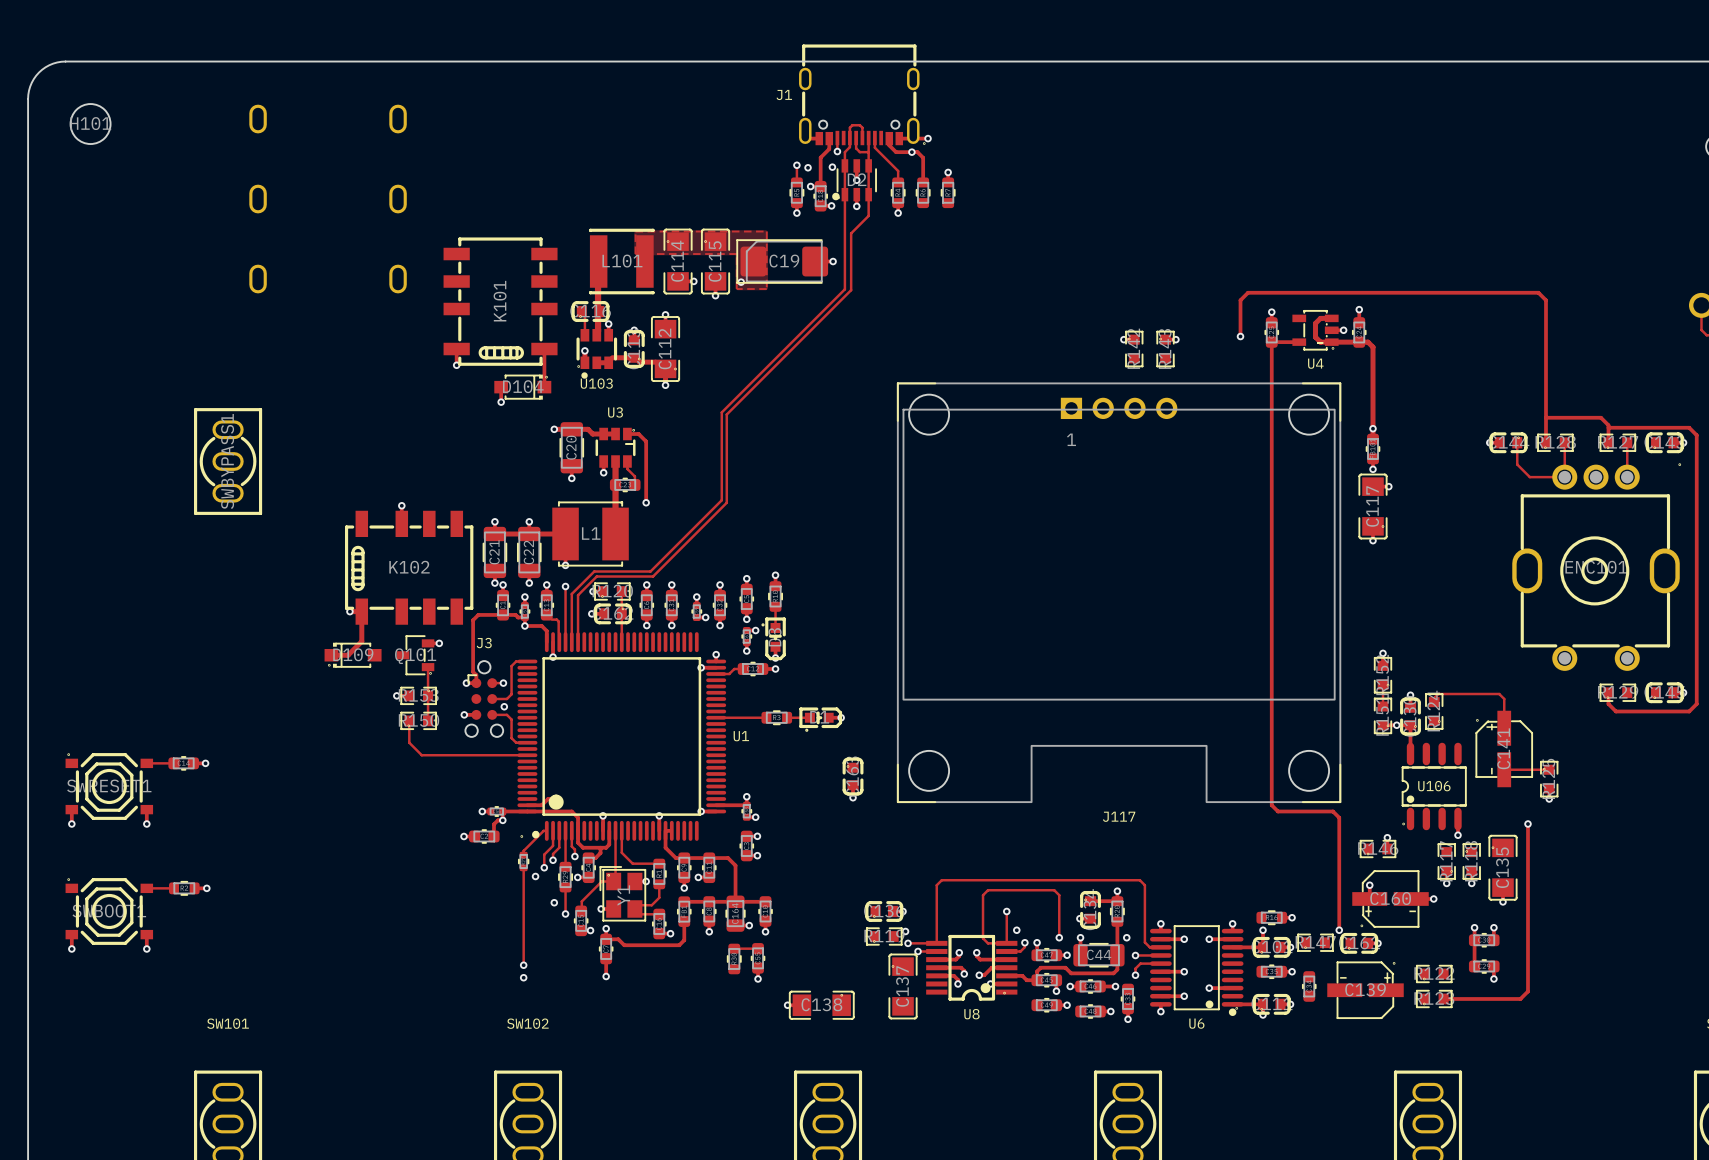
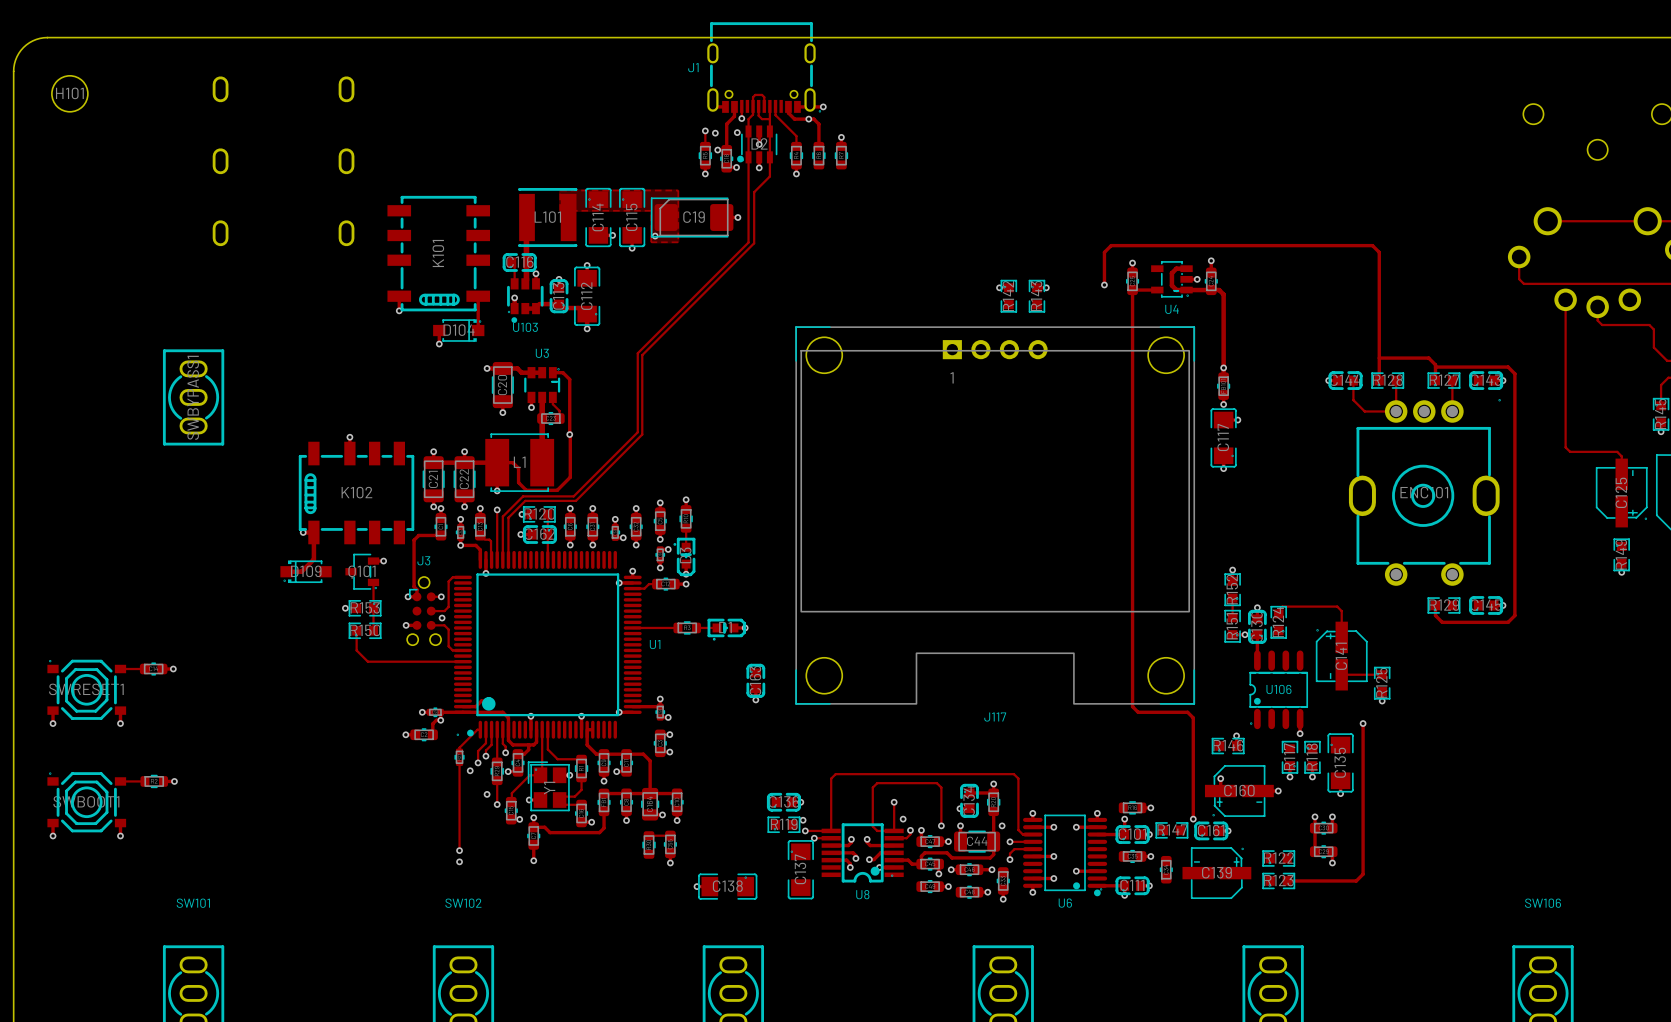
track: none -> (569, 434) (570, 477) (557, 490) (526, 490) (518, 482) (518, 468) (512, 462) (497, 462)
track: (503, 614) (524, 617) -> none

